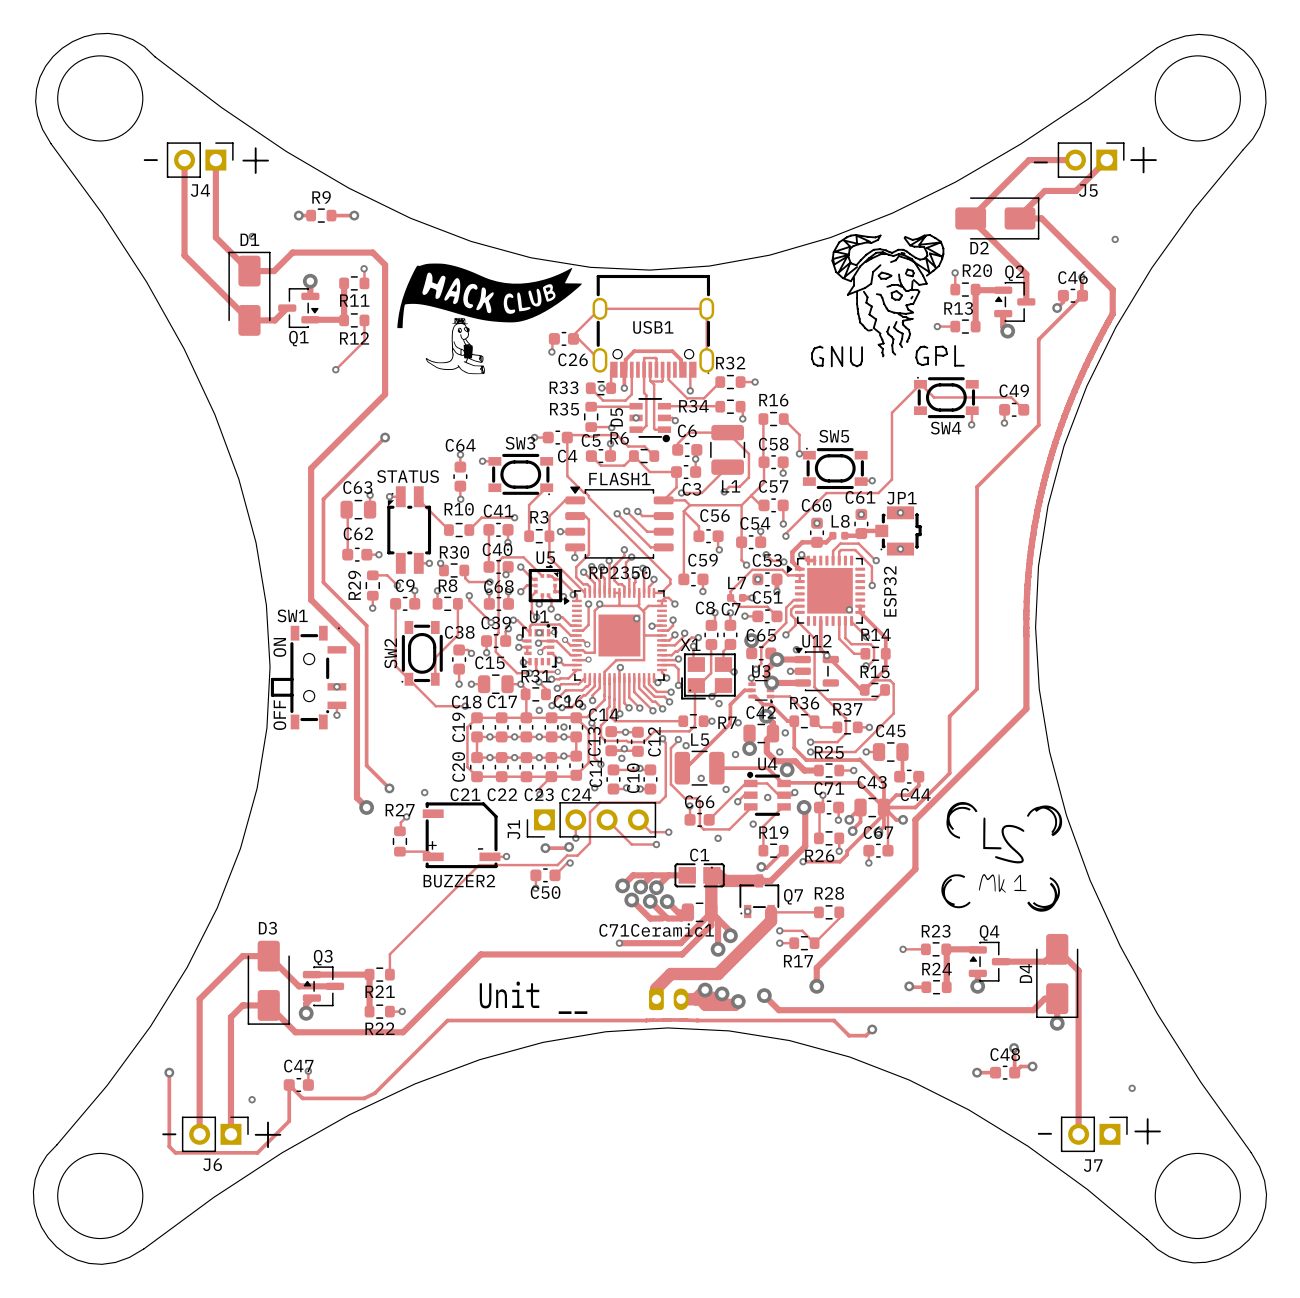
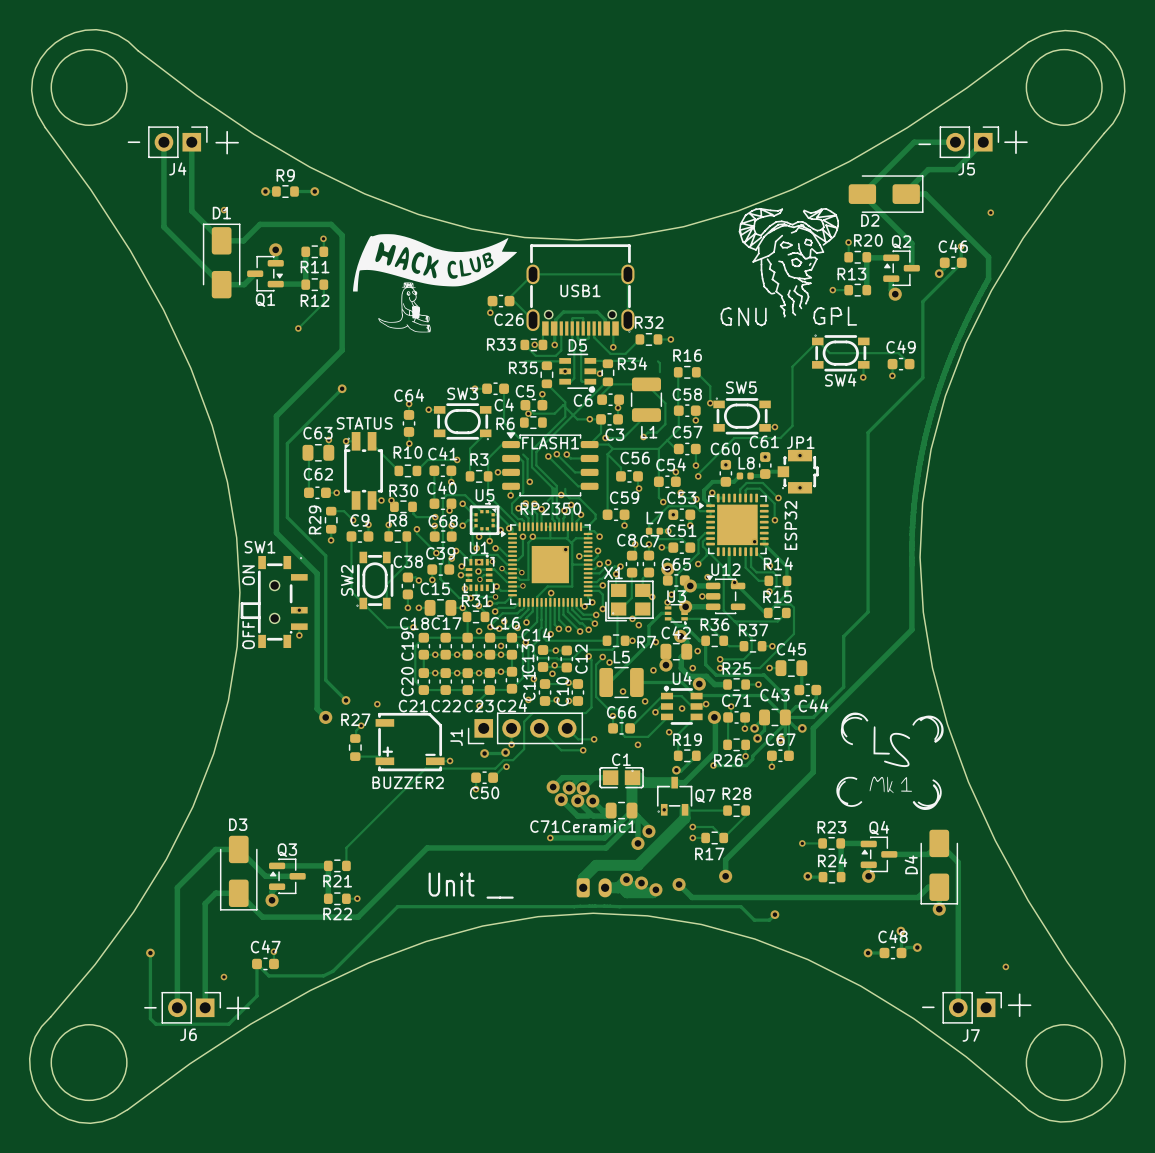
R34 name position: R34 (693, 406) -> R34 (632, 363)
R34 rotation: 0° (730, 406) -> 90° clockwise (607, 372)
R34 position: (730, 406) -> (607, 372)
R35 position: (591, 416) -> (546, 374)
D5 name rotation: 0° (616, 417) -> 90° clockwise (577, 345)
D5 name position: D5 (616, 417) -> D5 (577, 345)
via: (742, 418) -> none
track: (591, 427) (611, 427) -> none
via: (611, 427) -> none
C6 name position: C6 (687, 430) -> C6 (583, 400)
track: (569, 435) (616, 435) (628, 446) (644, 446) (654, 456) -> none
R6 name position: R6 (619, 438) -> R6 (505, 423)
R6 position: (644, 456) -> (533, 422)
via: none -> (528, 413)
via: none -> (589, 419)
FLASH1 name position: FLASH1 (619, 479) -> FLASH1 (550, 443)
track: (588, 497) (652, 560) -> (565, 488) (565, 493) (569, 498) (579, 498)
track: none -> (523, 454) (527, 458) (527, 479) (529, 481)
via: none -> (529, 481)
via: (624, 549) -> none
track: (631, 557) (626, 562) (626, 575) (629, 579) (629, 584) -> (607, 381) (536, 452) (536, 465) (556, 485) (556, 517) (559, 519)
track: (609, 560) (609, 573) -> none
via: (609, 560) -> none
track: (616, 563) (614, 565) (614, 580) (618, 584) (621, 584) -> (546, 383) (565, 402) (565, 416) (531, 450) (531, 467) (552, 487) (552, 519)
via: none -> (541, 509)

